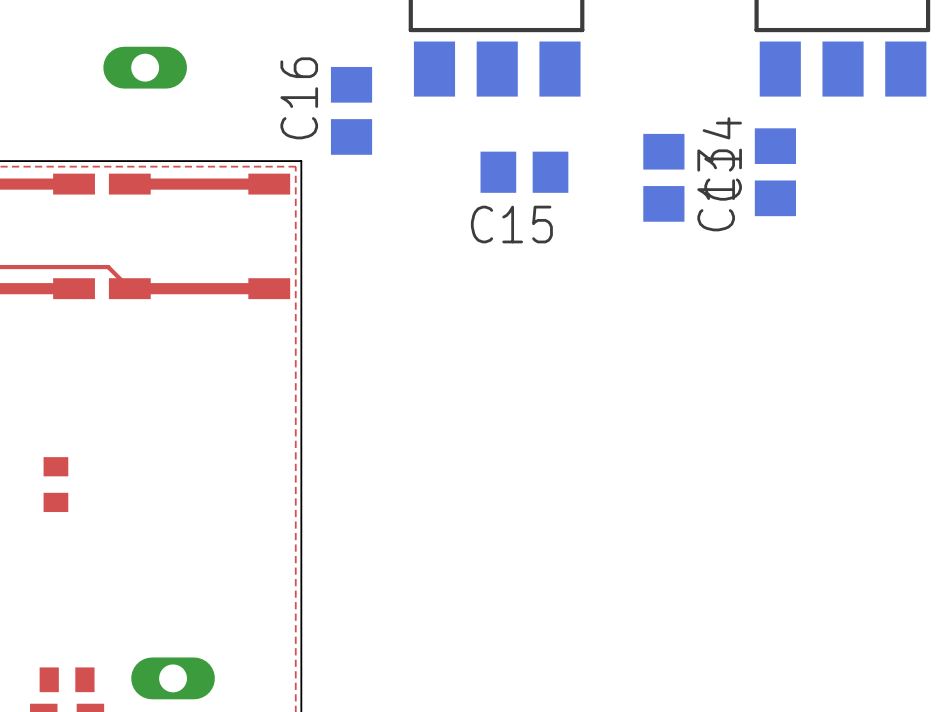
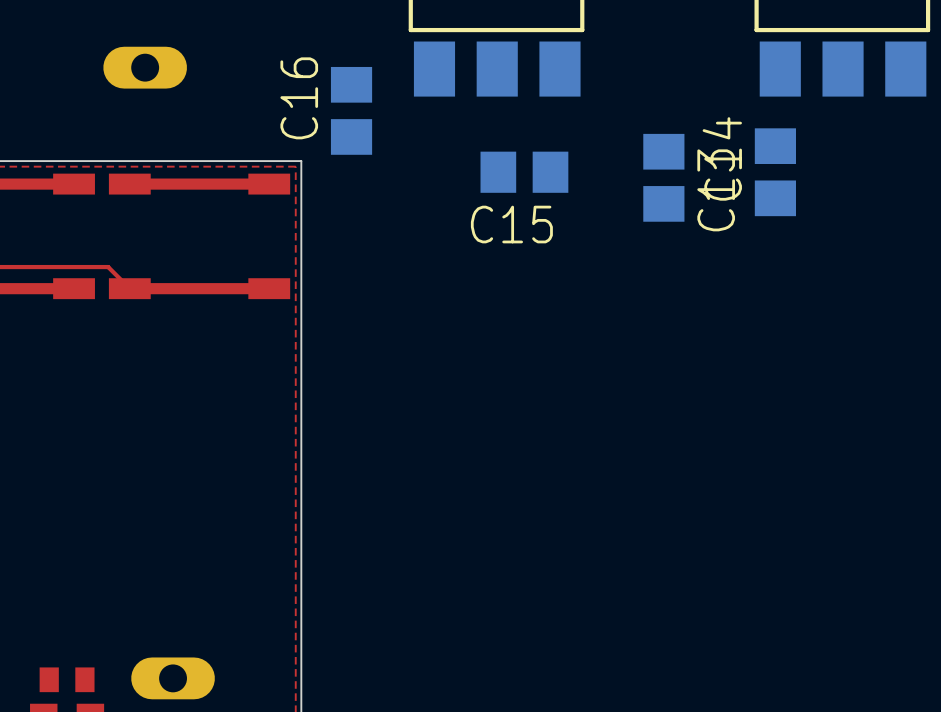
part: (55, 484) -> none

